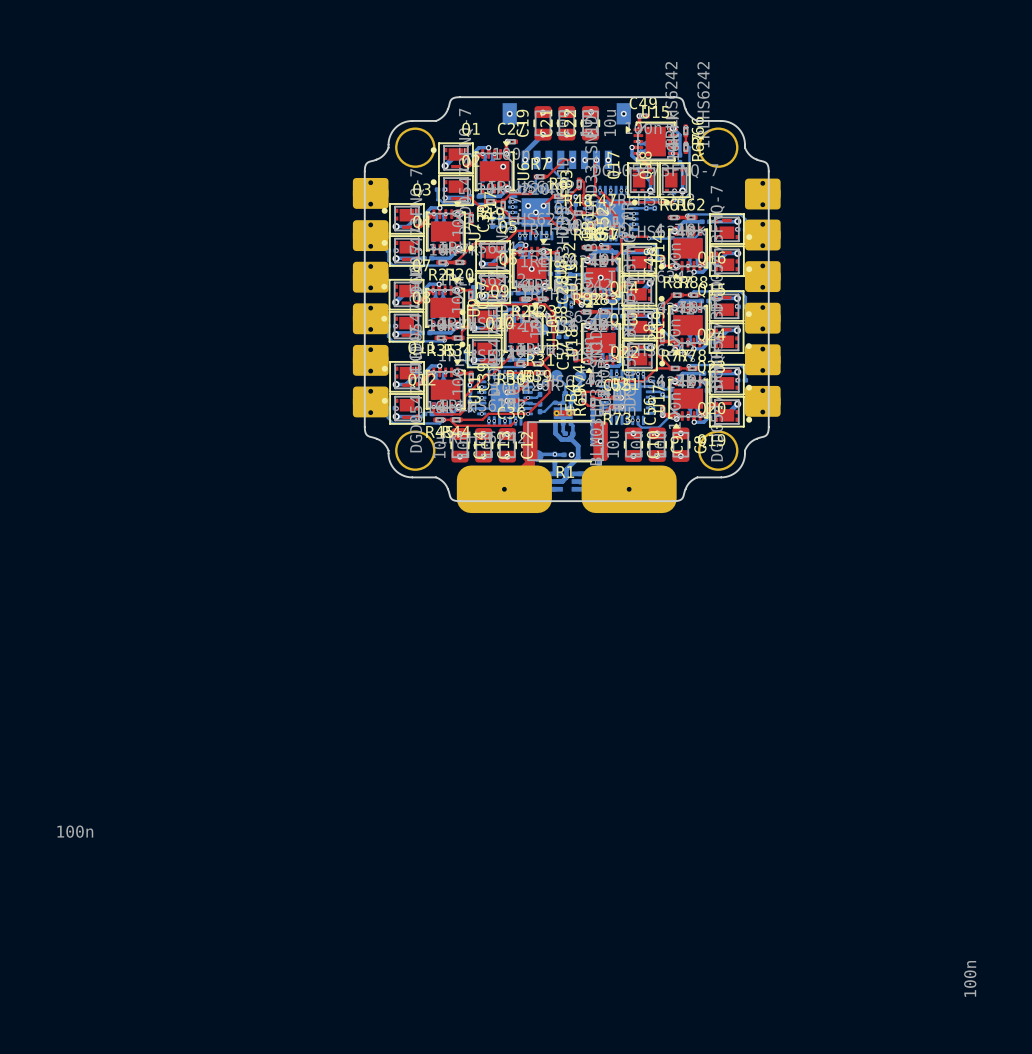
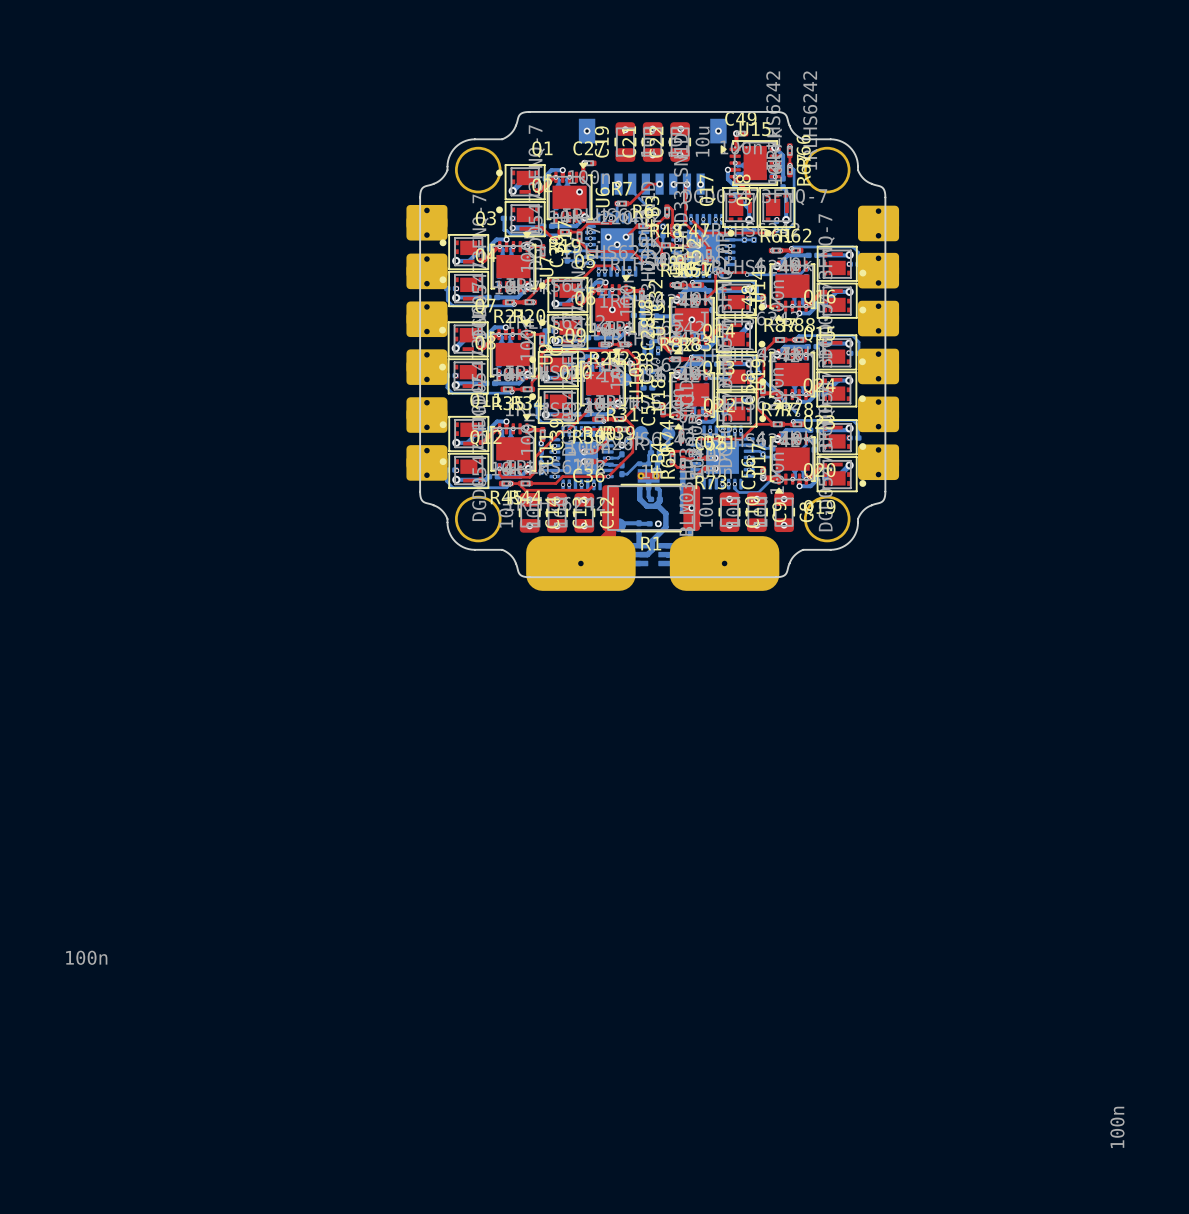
bottom track: (543, 134) (525, 152) (525, 159) -> none
via: (543, 134) -> none
via: (506, 153) -> none
via: (525, 159) -> none
via: (548, 159) -> none
via: (543, 251) -> none
via: (676, 265) -> none
via: (457, 290) -> none
via: (581, 304) -> none
via: (676, 418) -> none
via: (554, 454) -> none

